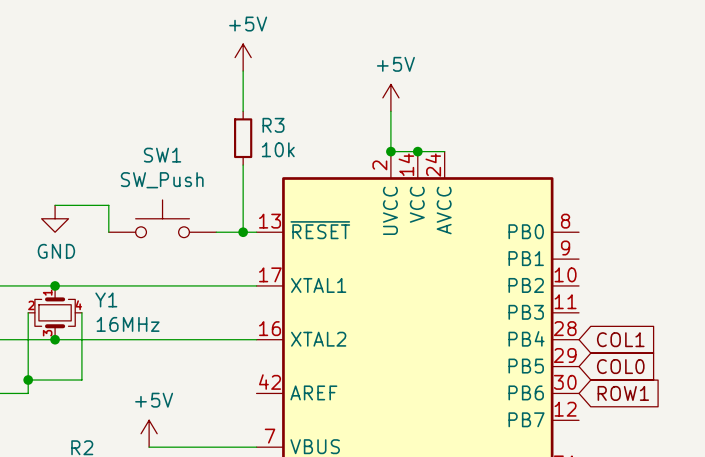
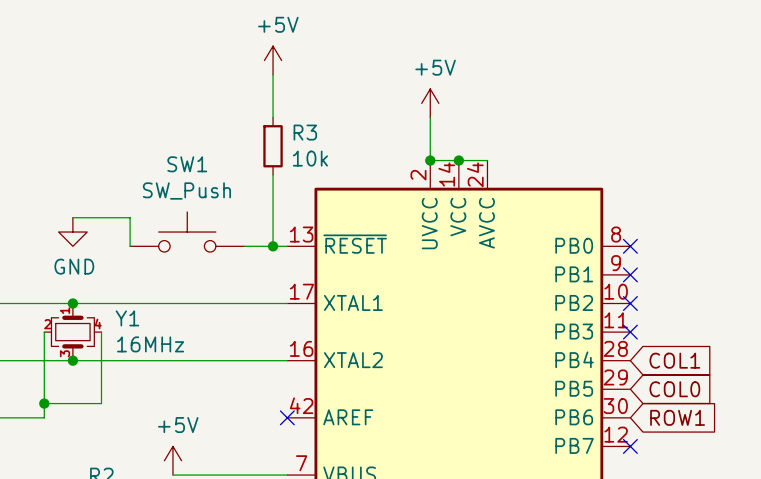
no-connect mark: none -> (630, 246)
no-connect mark: none -> (630, 274)
no-connect mark: none -> (630, 303)
no-connect mark: none -> (630, 332)
no-connect mark: none -> (287, 417)
no-connect mark: none -> (630, 446)

